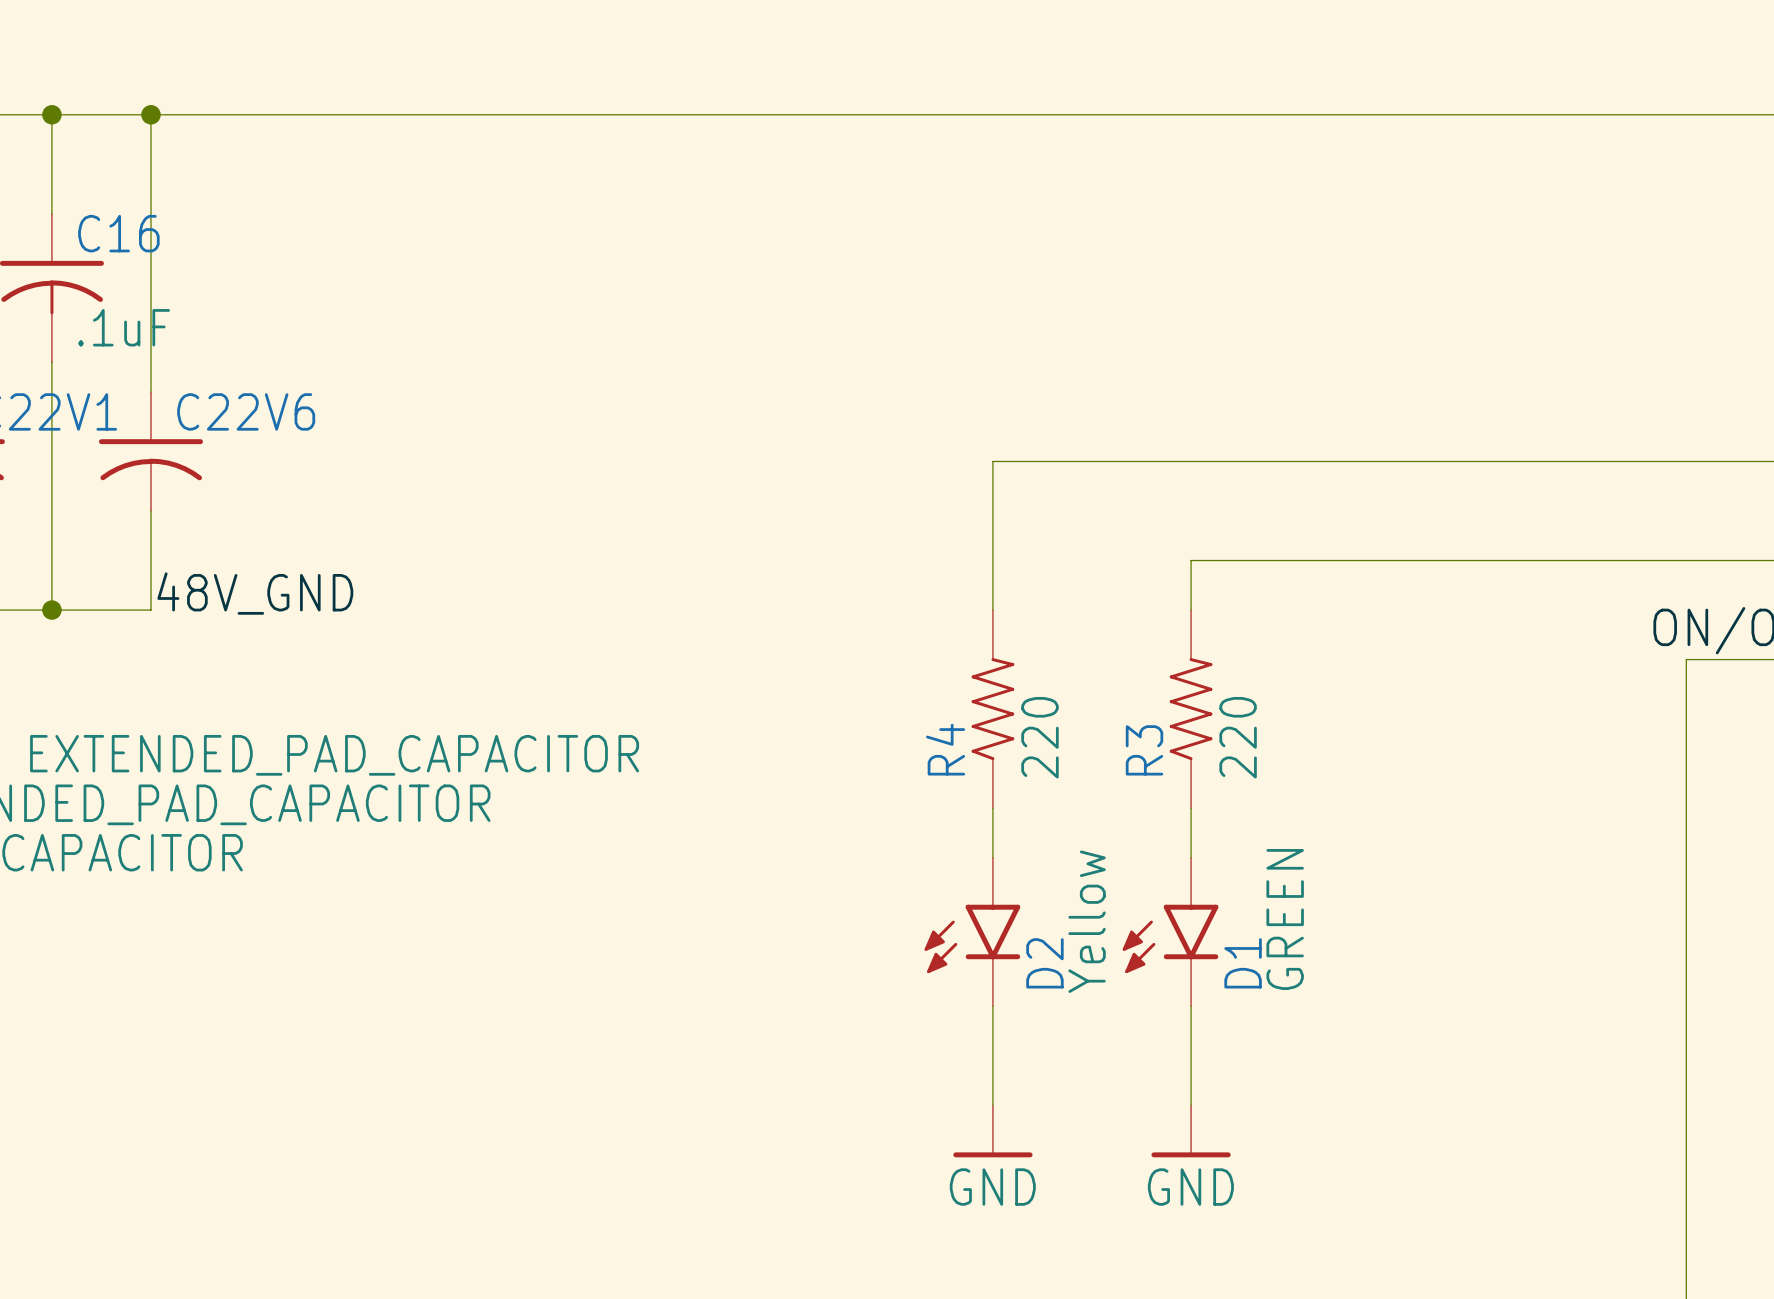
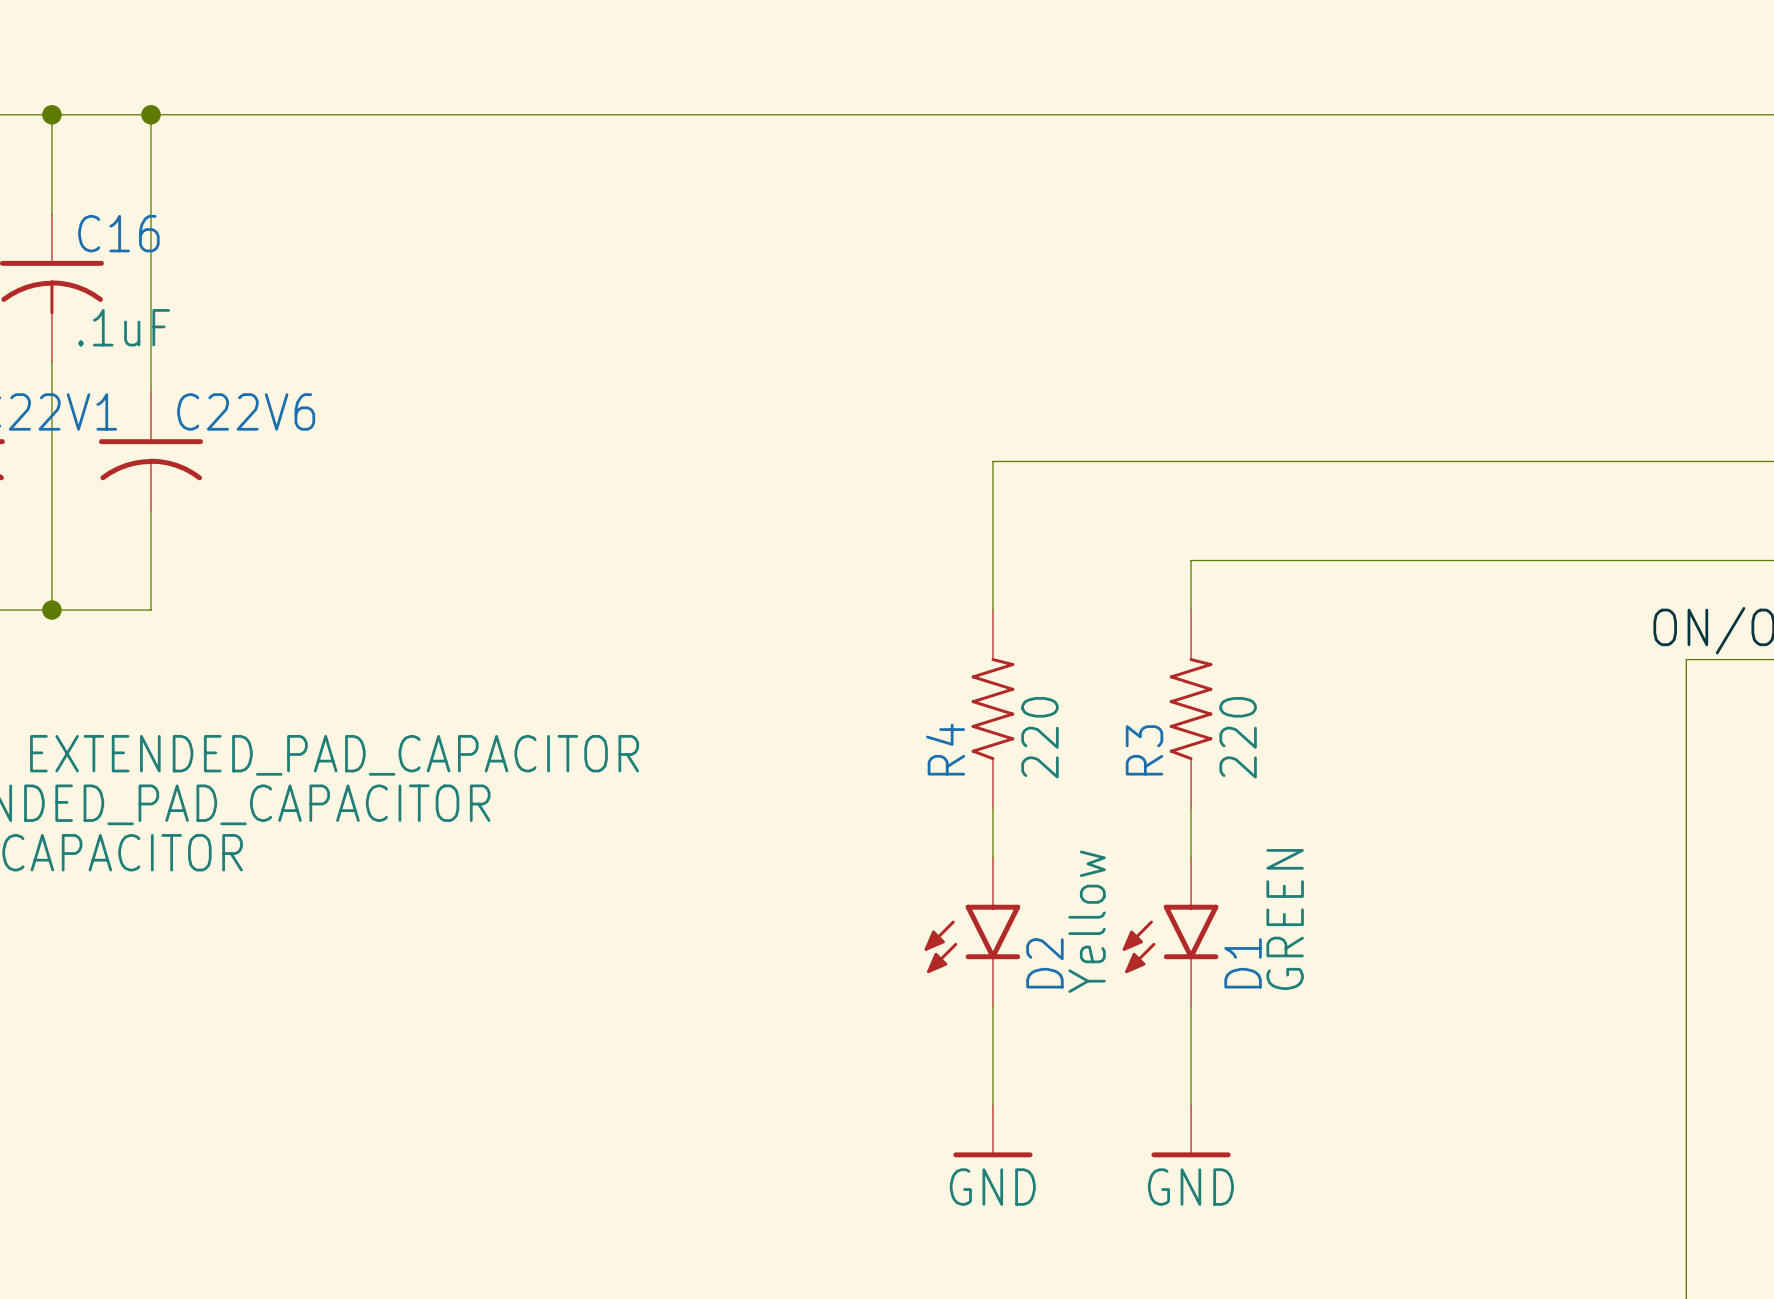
label: 48V_GND (255, 593) -> none

